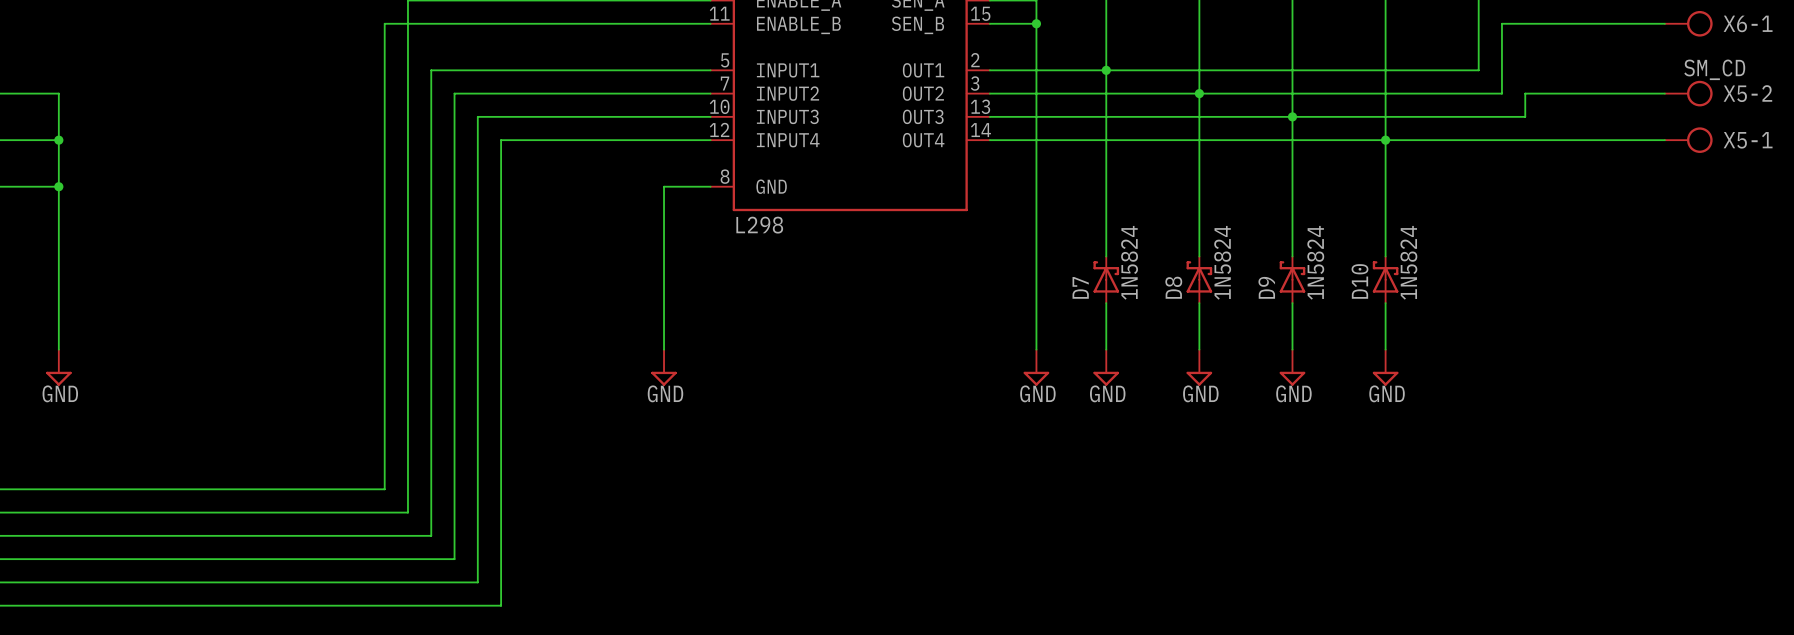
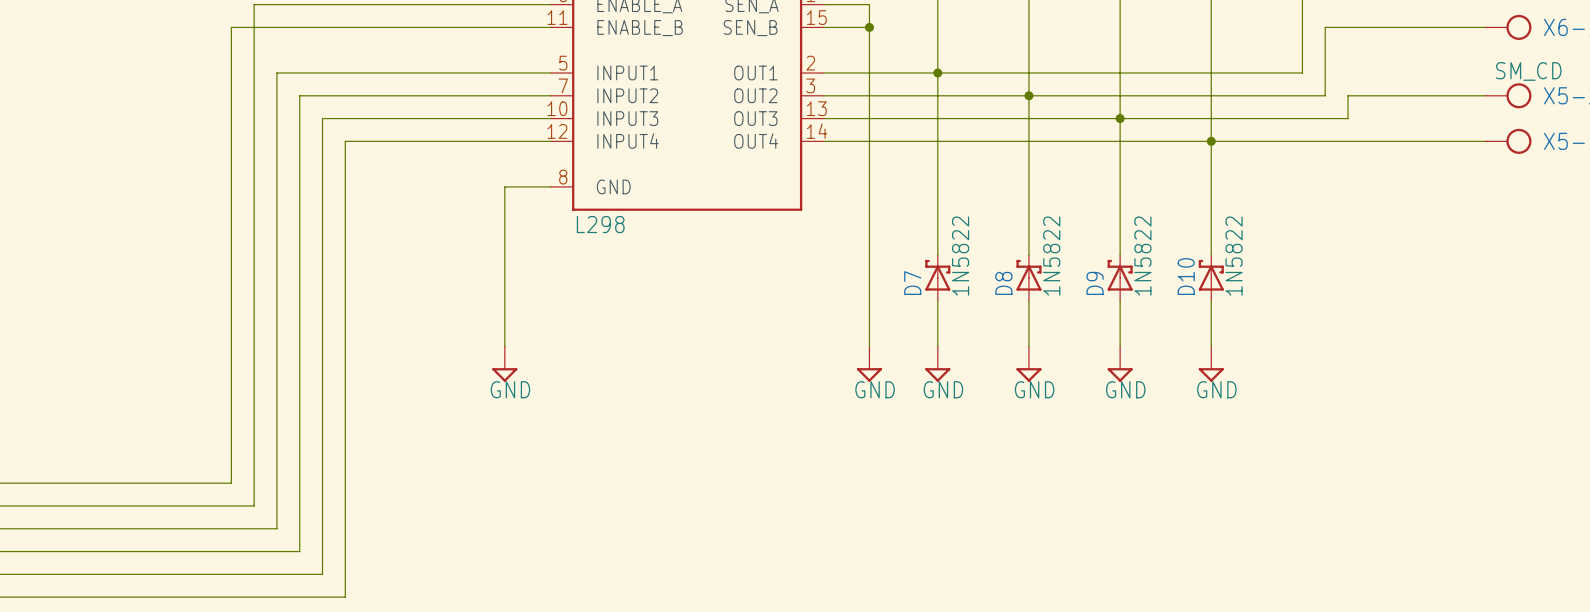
D7 value: 1N5824 (1129, 262) -> 1N5822 (960, 256)
D8 value: 1N5824 (1222, 262) -> 1N5822 (1051, 256)
D9 value: 1N5824 (1315, 262) -> 1N5822 (1142, 256)
D10 value: 1N5824 (1408, 262) -> 1N5822 (1234, 256)

